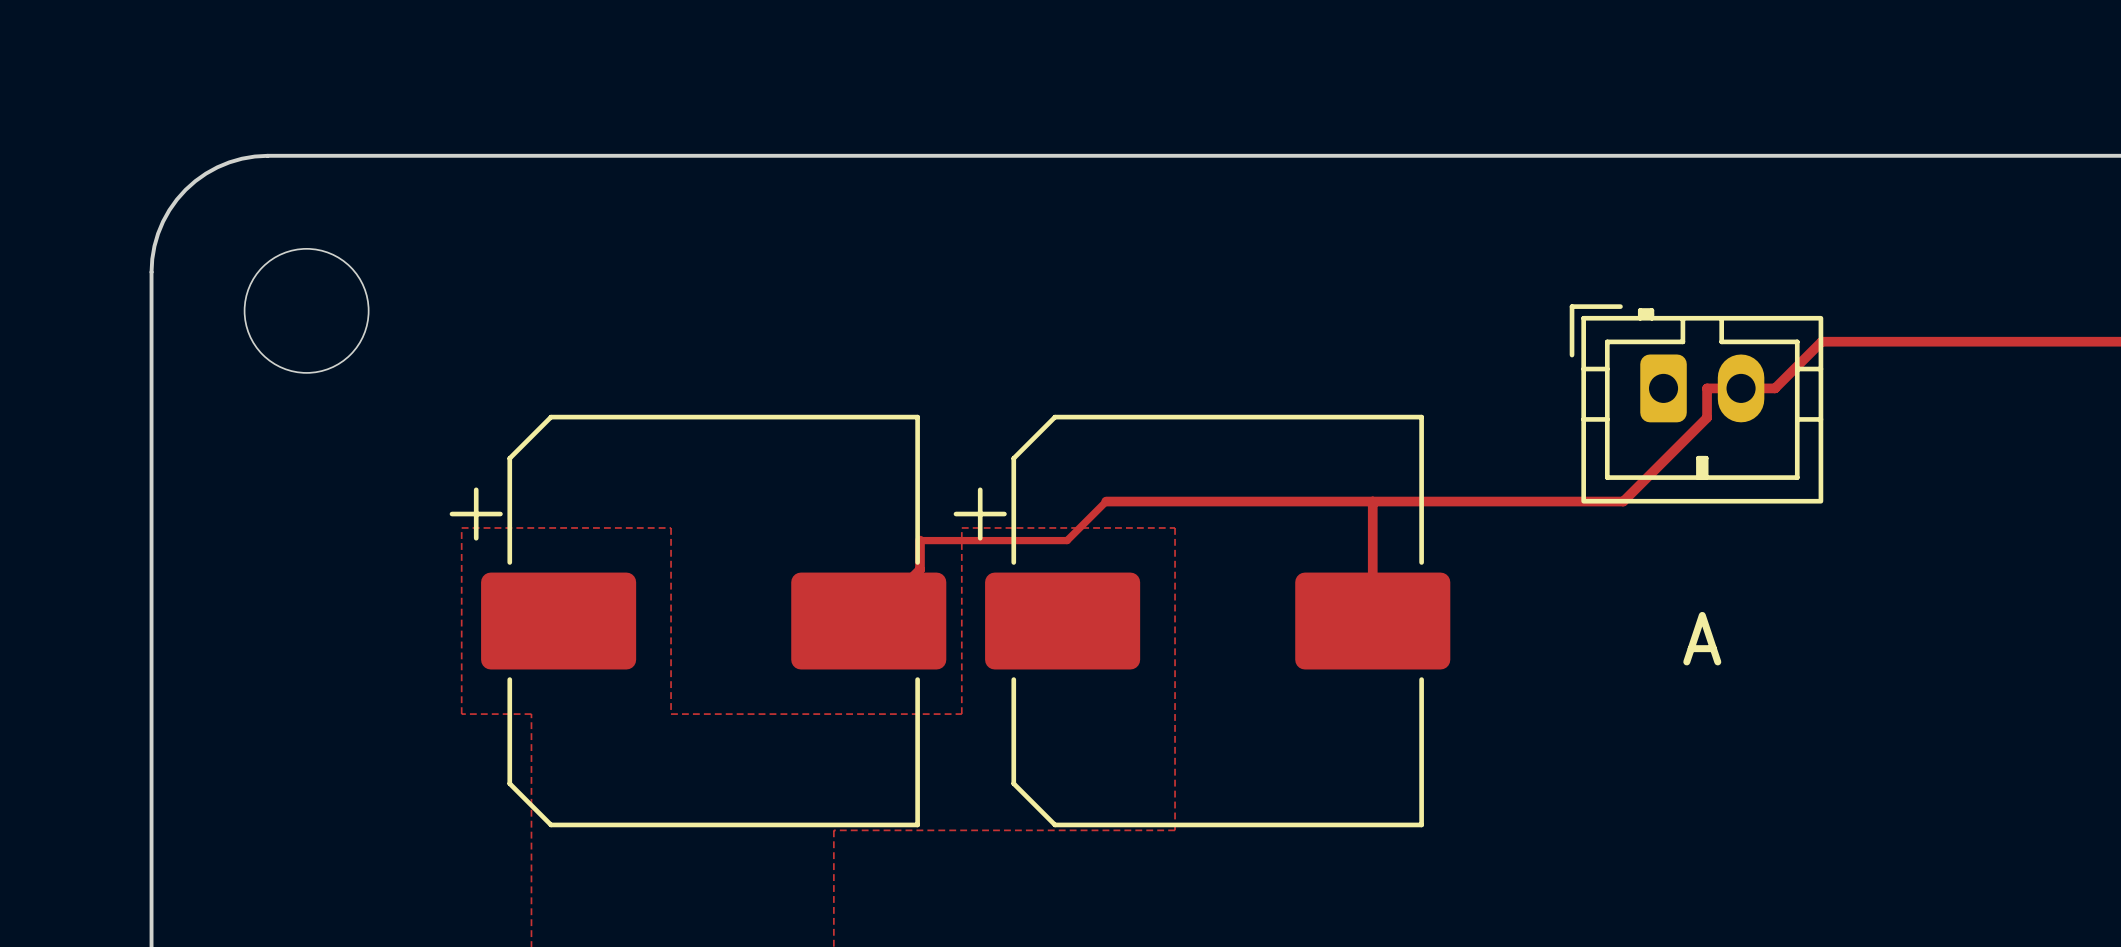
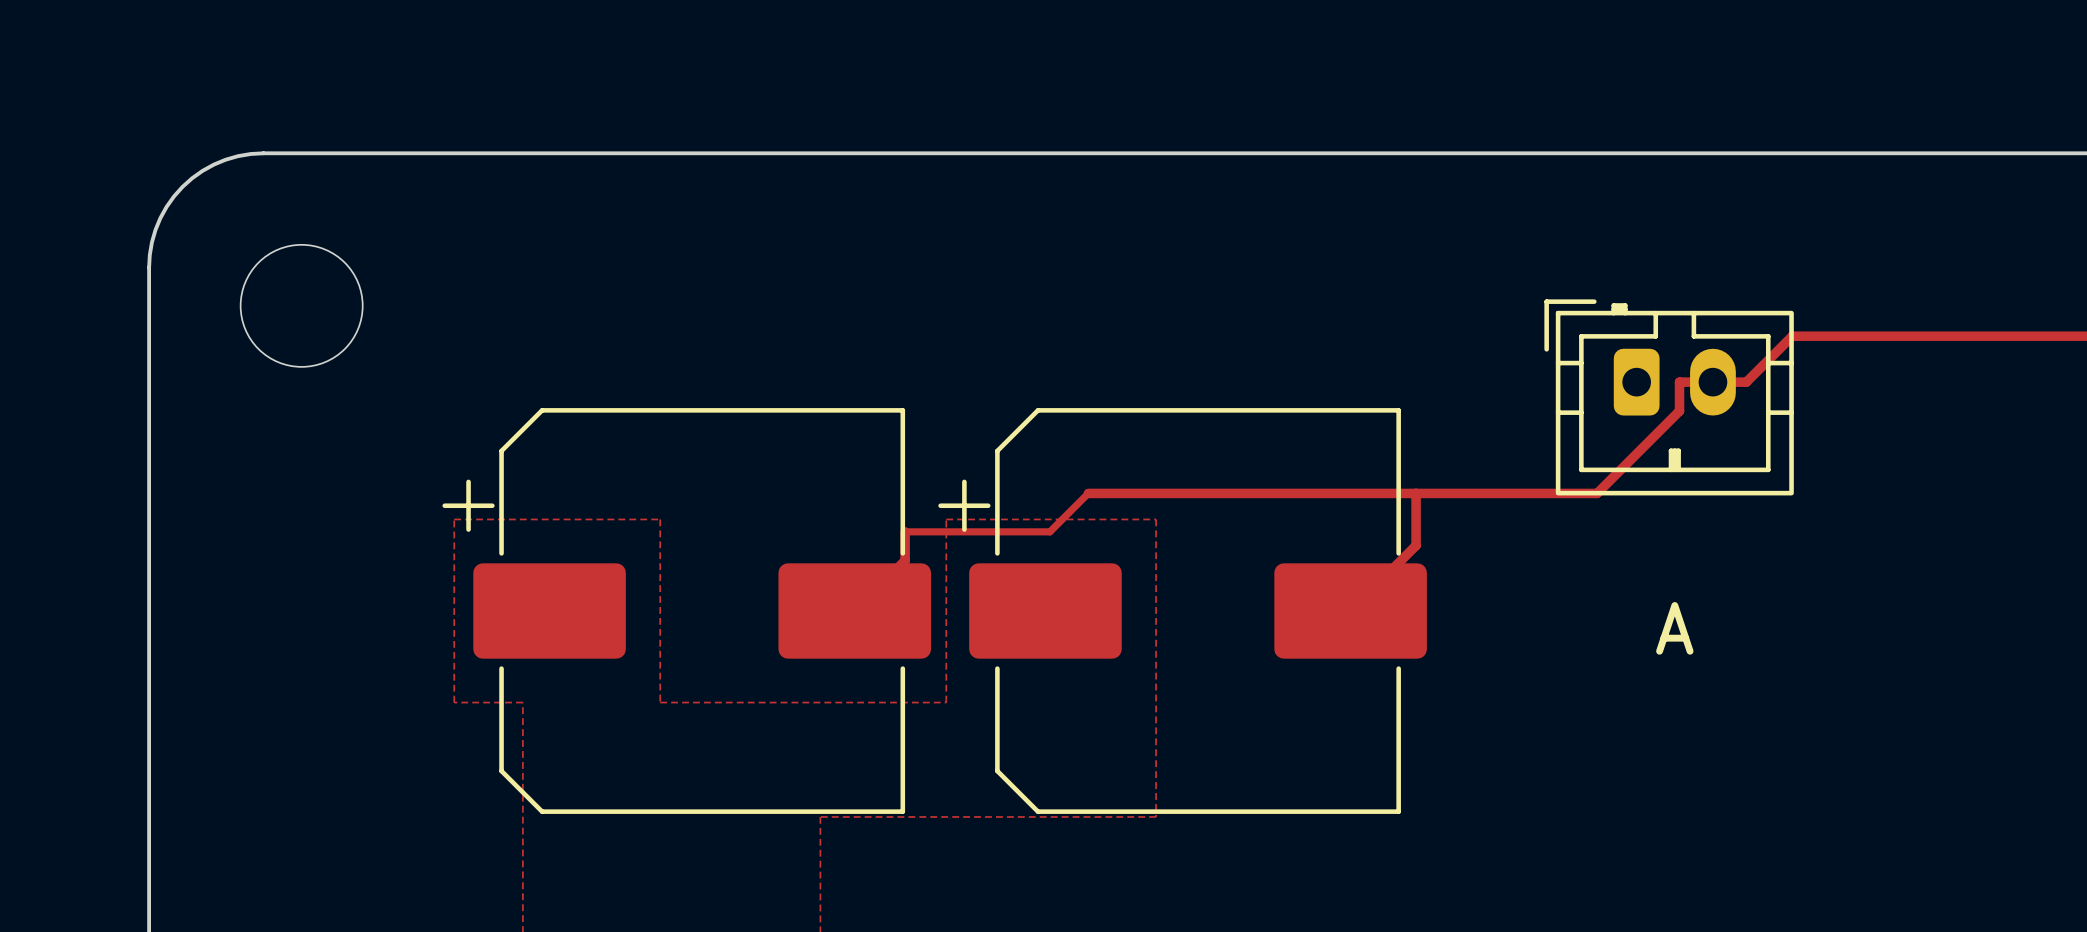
track: (1372, 501) (1372, 621) -> (1416, 493) (1416, 545) (1350, 611)

